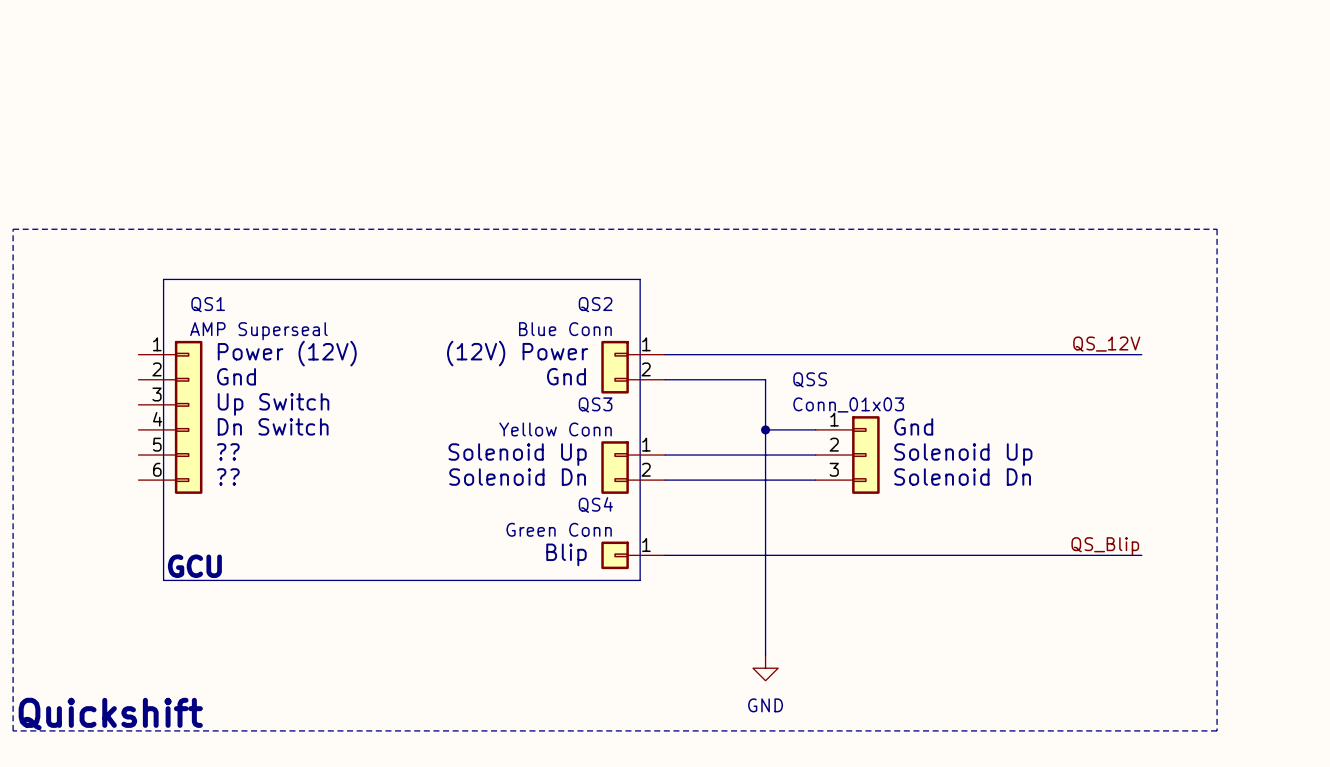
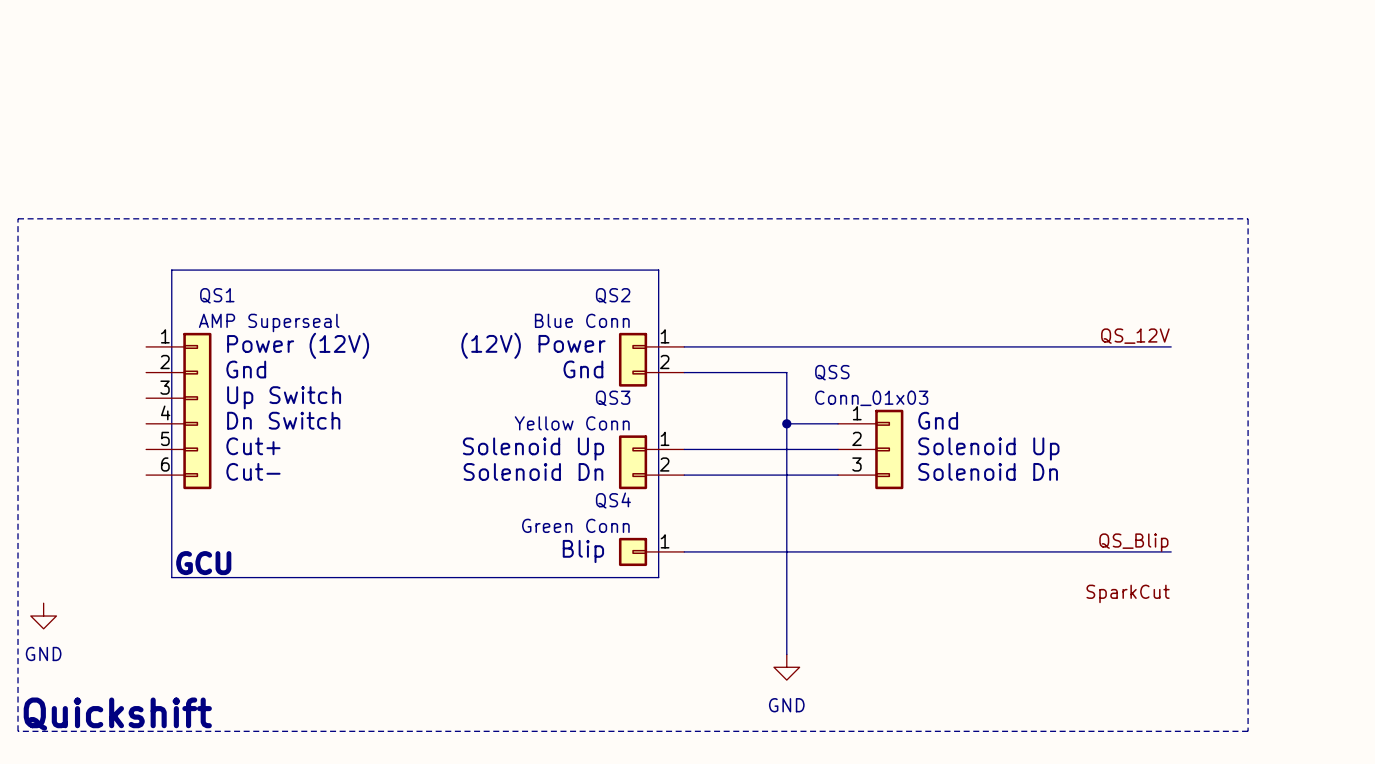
text: ?? (228, 451) -> Cut+ (253, 446)
text: ?? (228, 476) -> Cut- (253, 471)
label: none -> SparkCut (1128, 593)
power symbol: none -> GND (43, 616)

